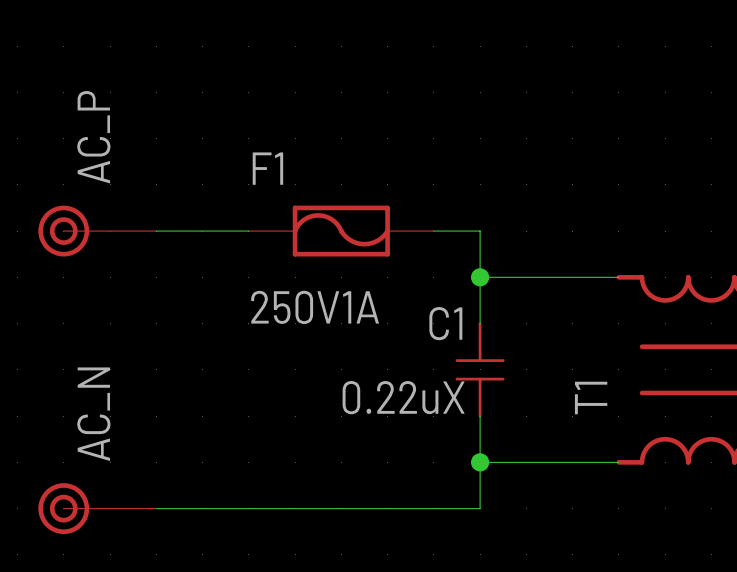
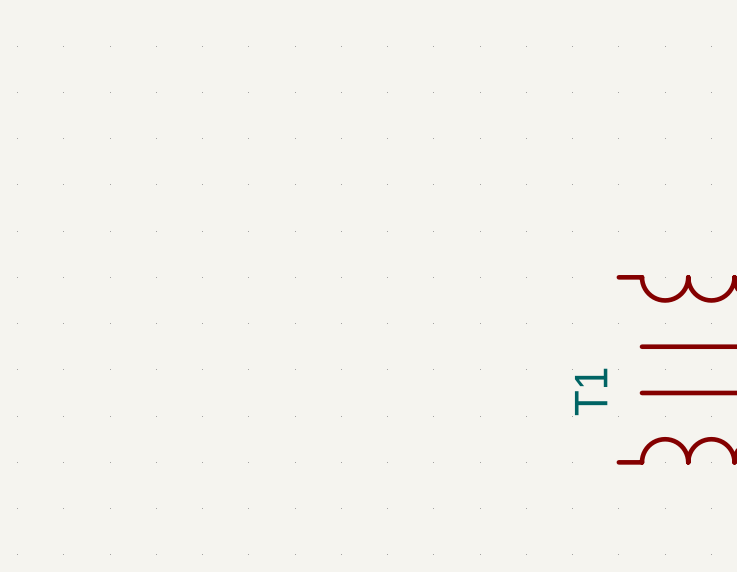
part: AC_P (97, 231) -> none
wire: (156, 231) (248, 231) -> none
F1: 250V1A (341, 231) -> none
wire: (433, 231) (480, 231) (480, 323) -> none
wire: (480, 277) (618, 277) -> none
junction: (480, 277) -> none
C1: 0.22uX (480, 369) -> none
wire: (480, 416) (480, 508) (156, 508) -> none
wire: (480, 462) (618, 462) -> none
junction: (480, 462) -> none
part: AC_N (97, 508) -> none

